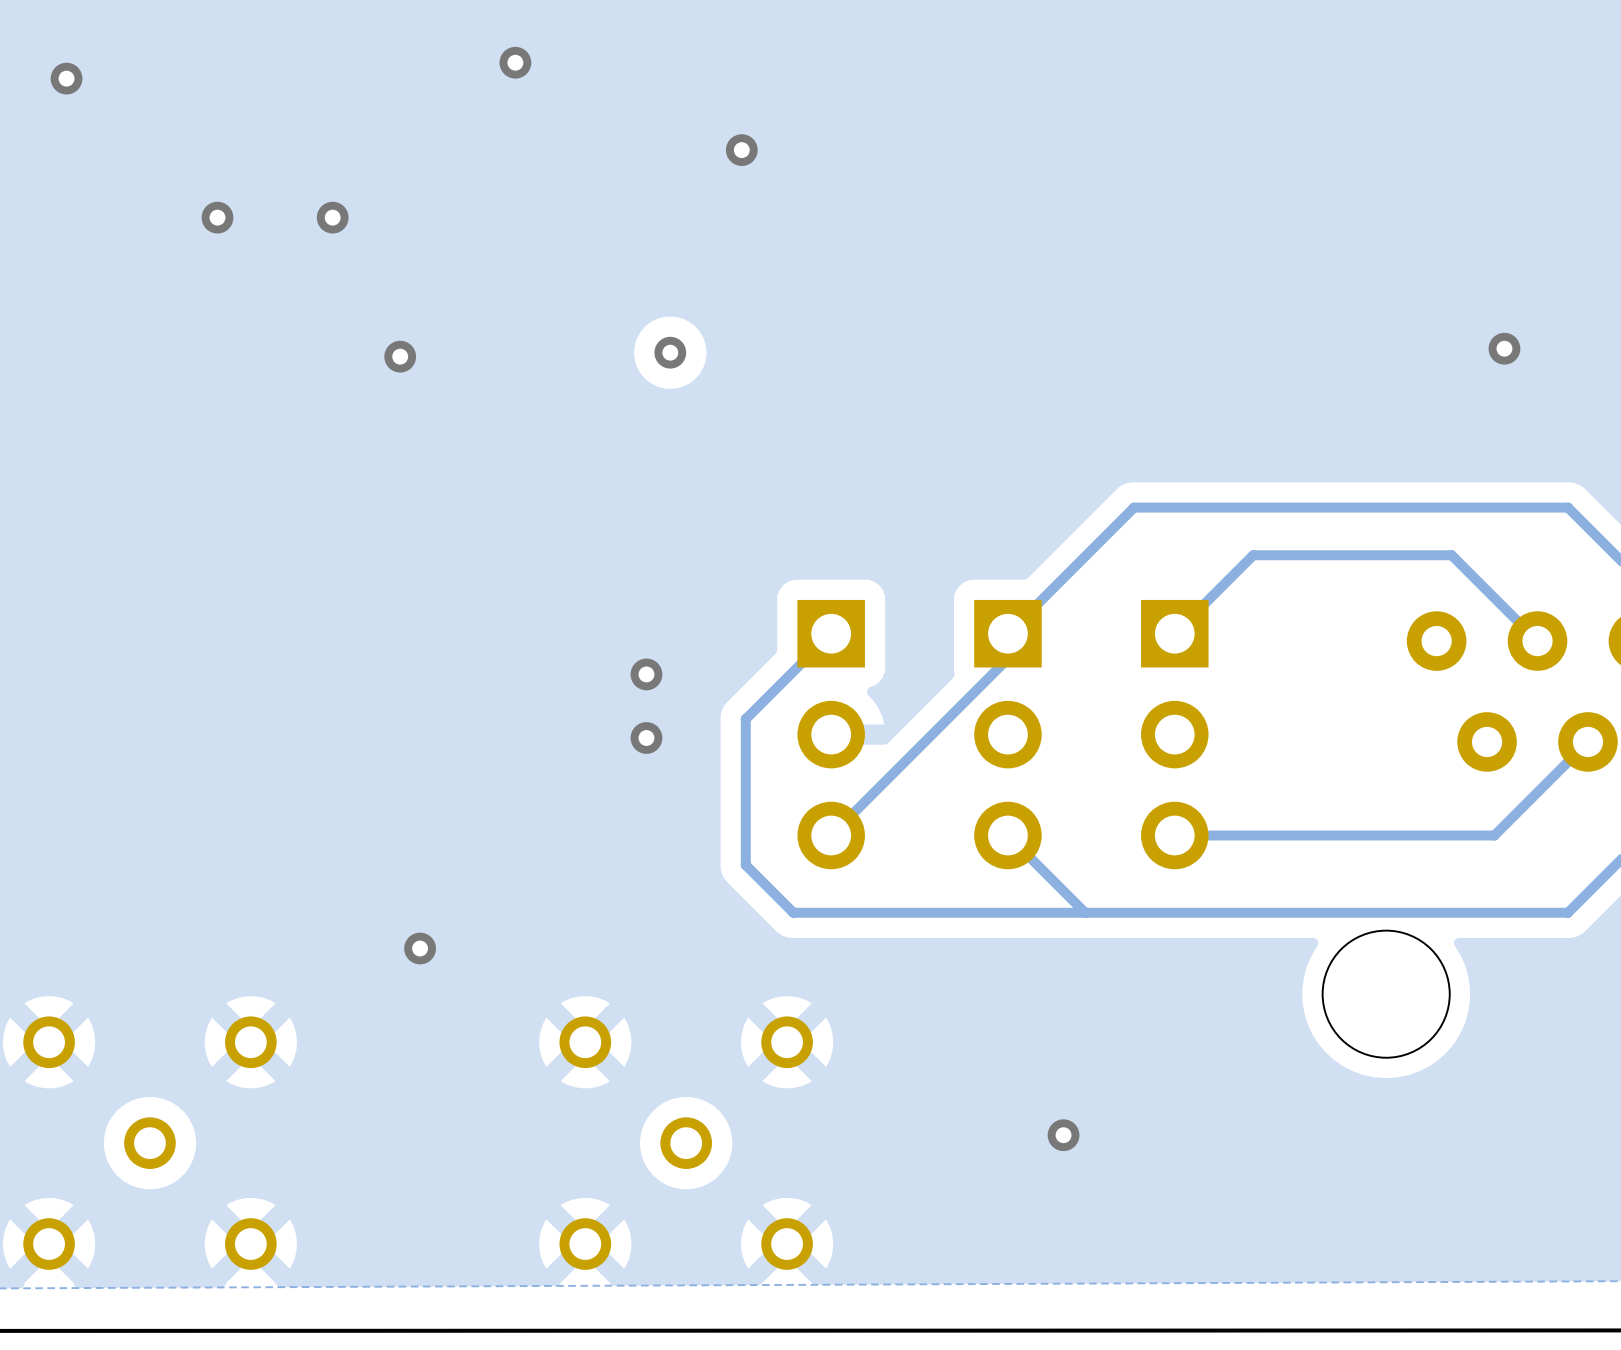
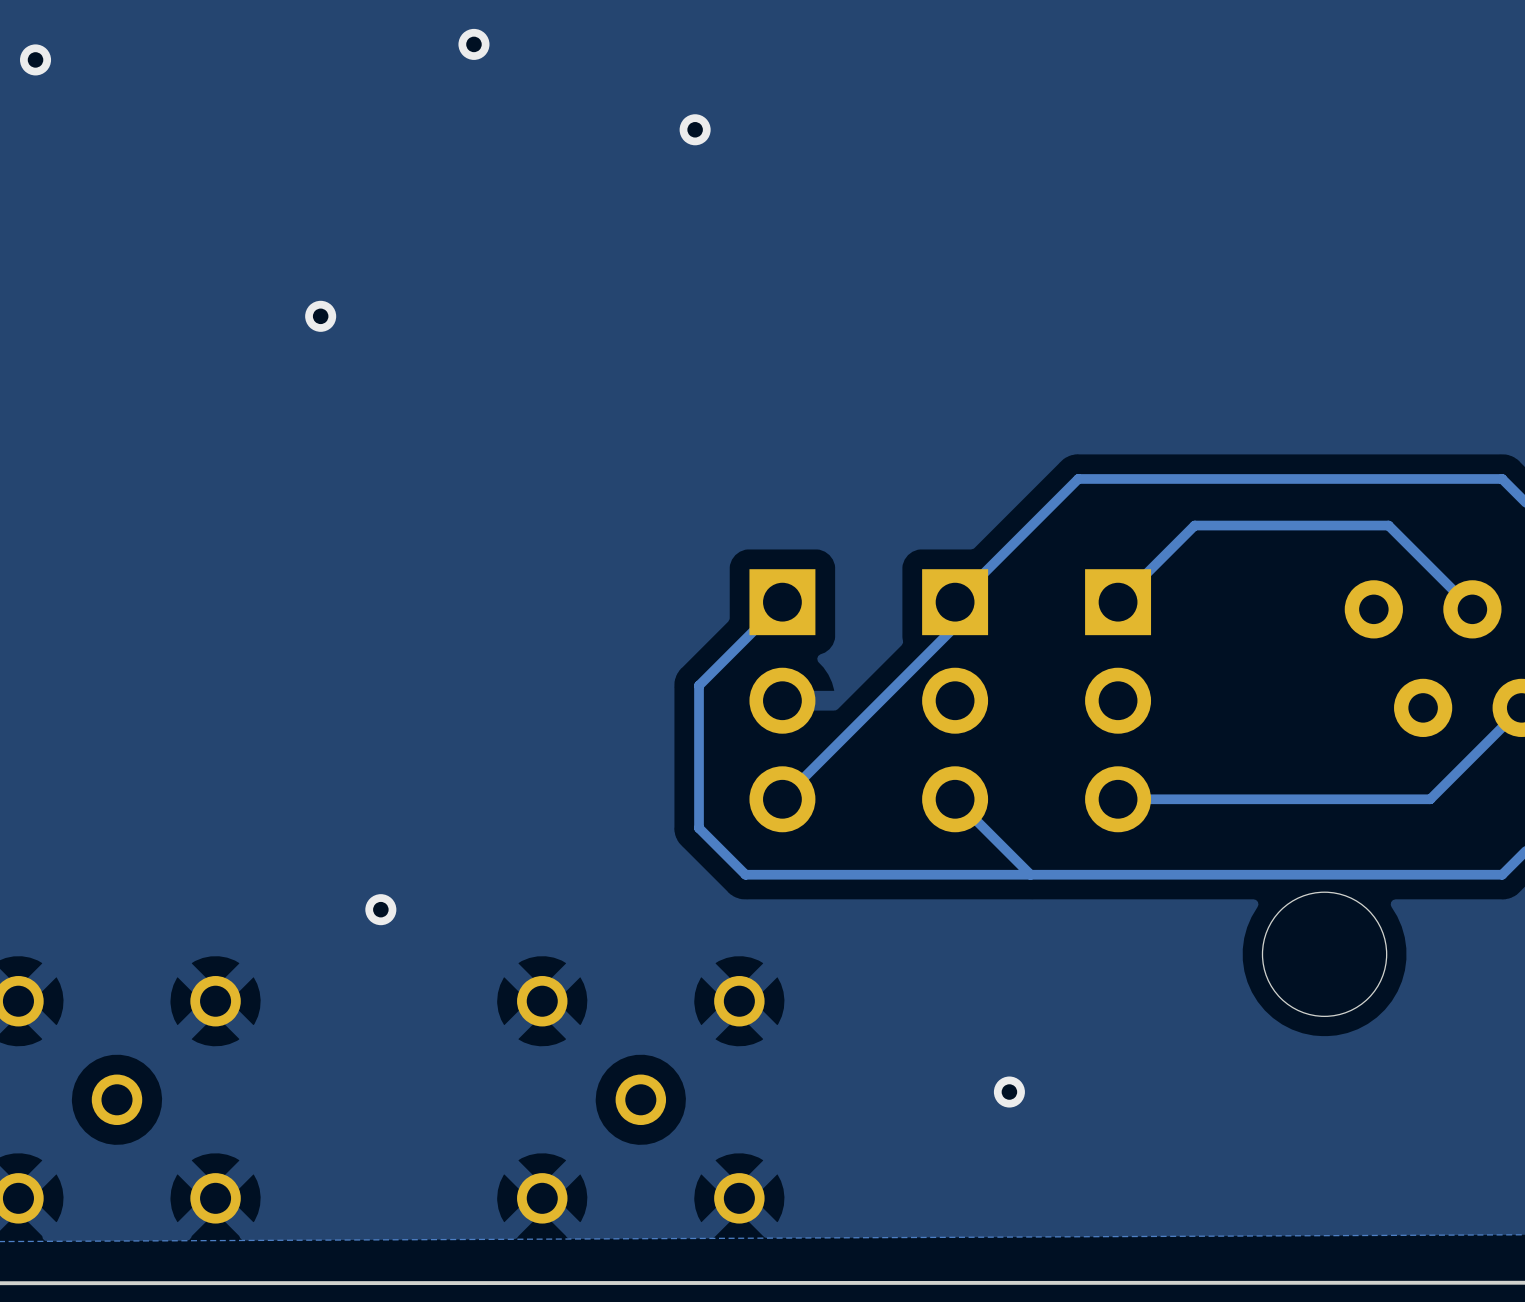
via: (217, 217) -> none
via: (332, 217) -> none
via: (1504, 348) -> none
via: (670, 352) -> none
via position: (400, 356) -> (320, 316)
via: (646, 674) -> none
via: (646, 737) -> none

